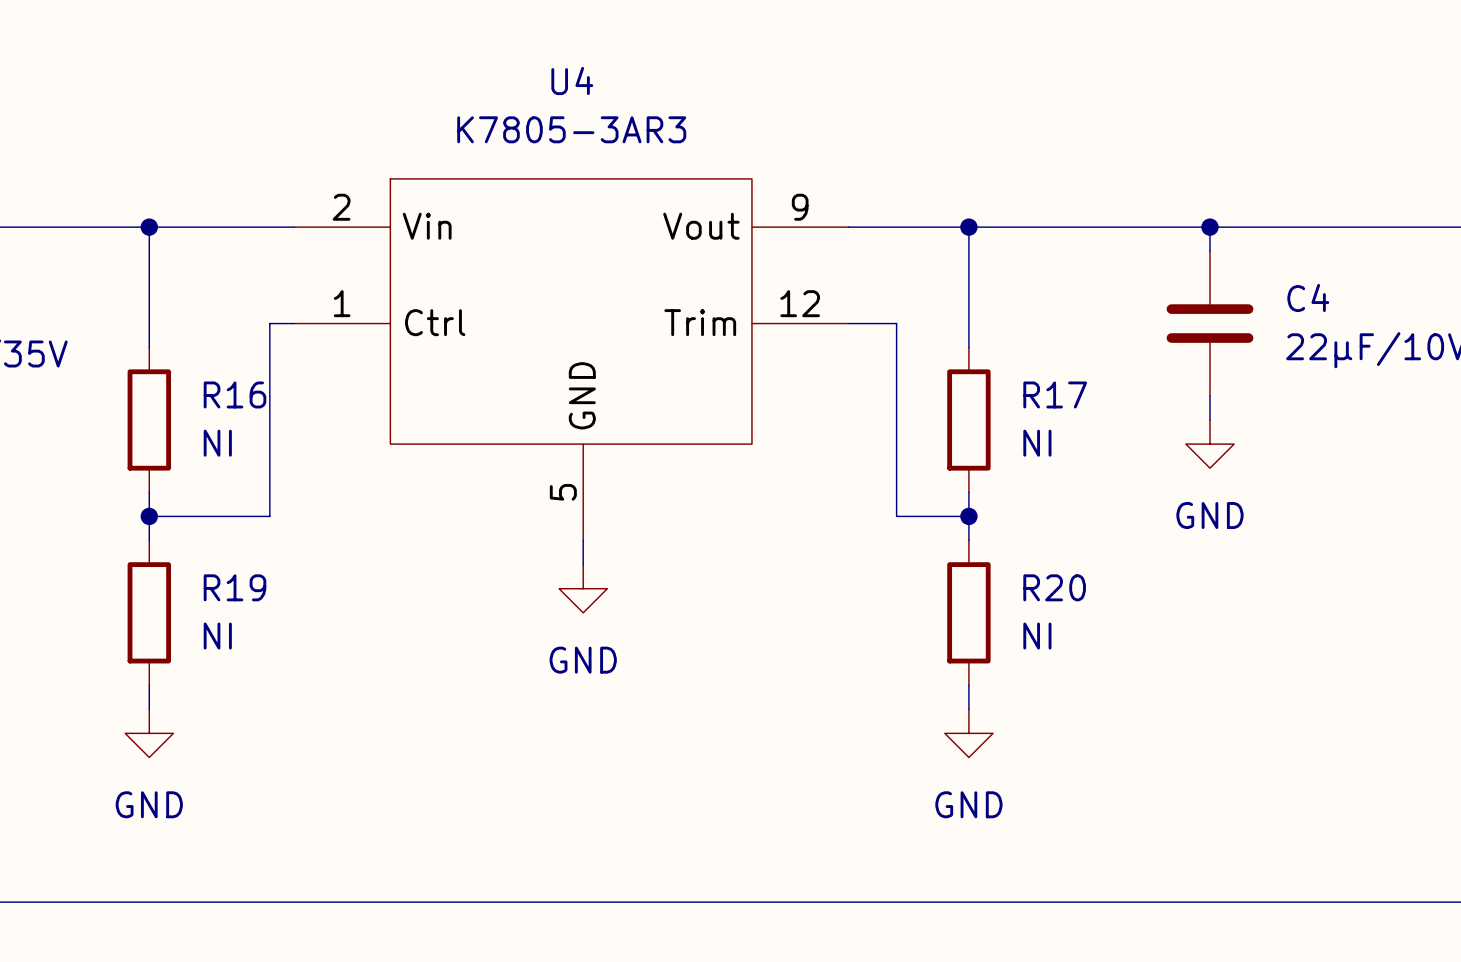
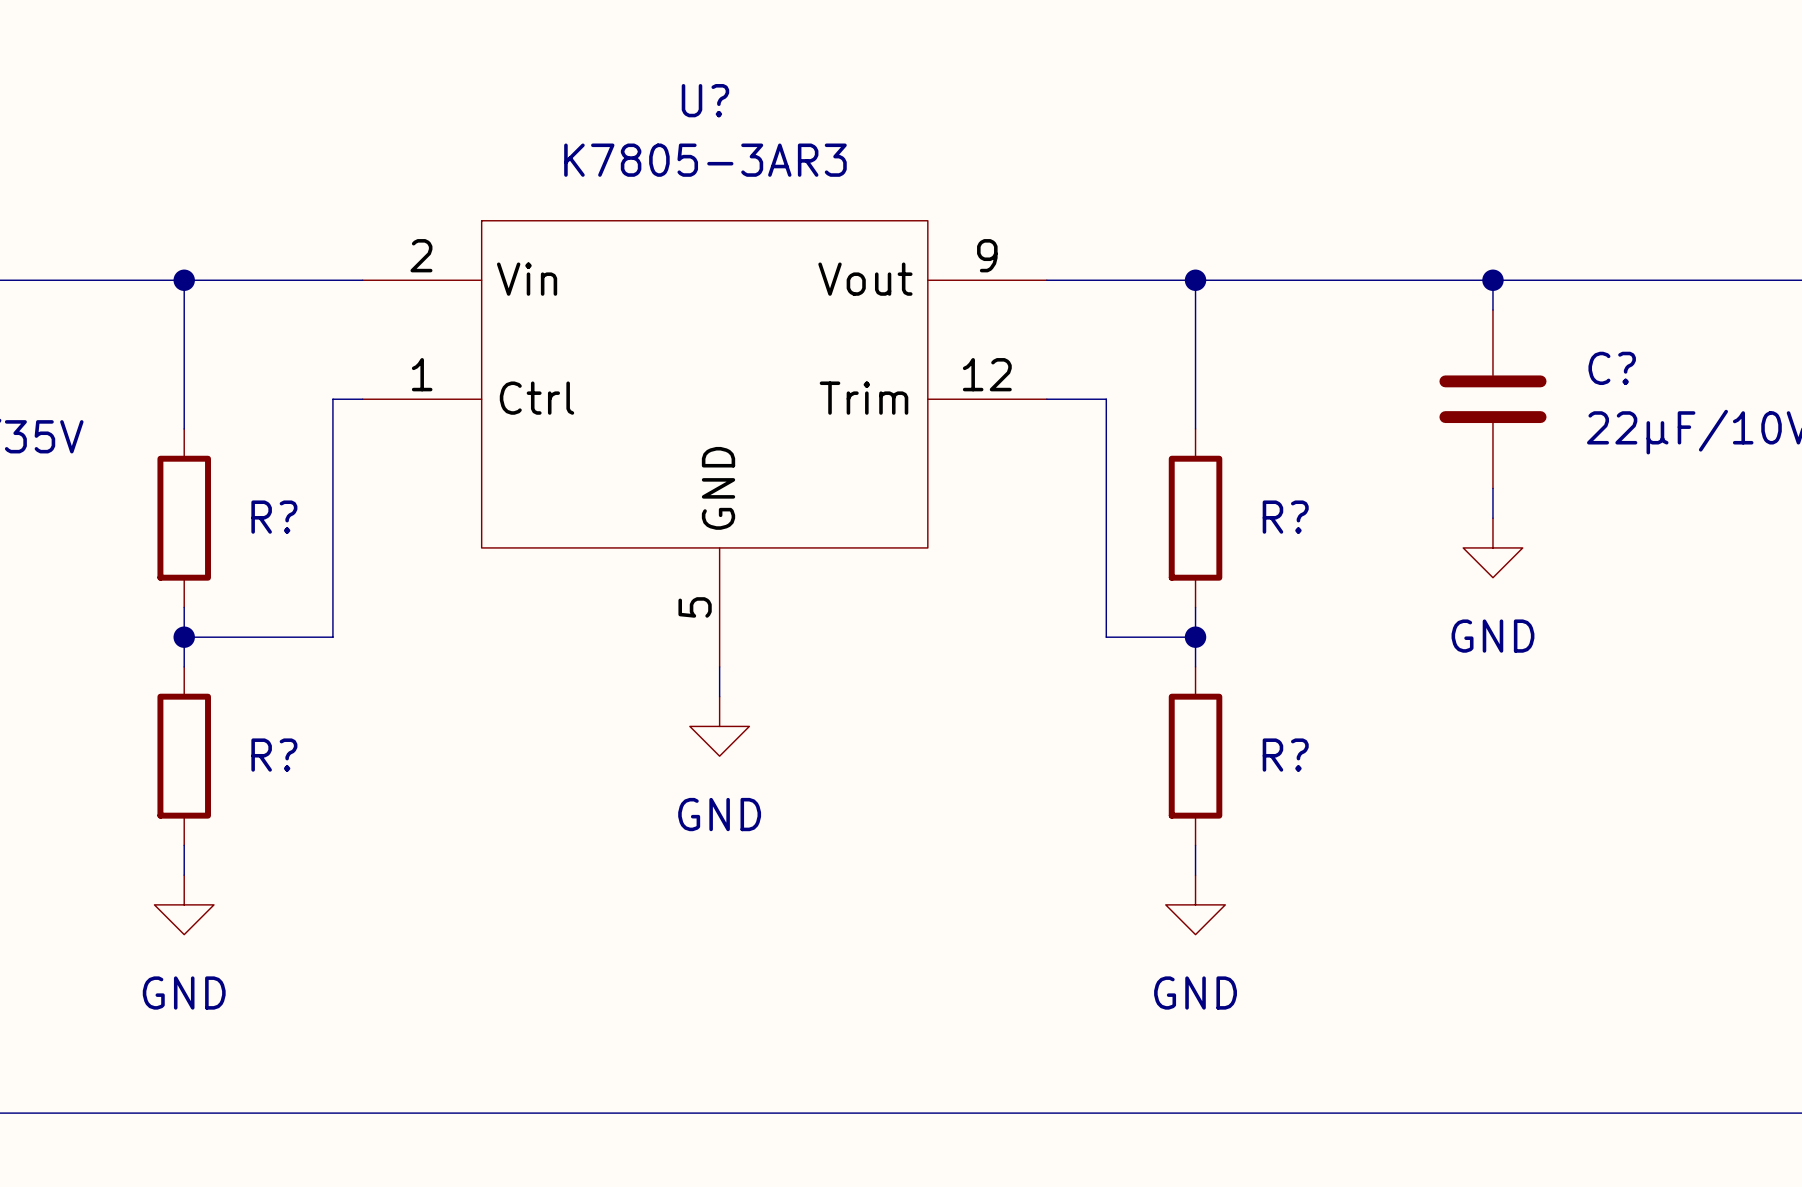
U4 name: U4 (572, 81) -> U? (705, 100)
C4 name: C4 (1308, 297) -> C? (1612, 368)
R16 name: R16 (235, 394) -> R? (274, 517)
R17 name: R17 (1055, 394) -> R? (1285, 517)
R16 value: NI (217, 443) -> none
R17 value: NI (1037, 443) -> none
R19 name: R19 (235, 587) -> R? (274, 755)
R20 name: R20 (1054, 587) -> R? (1285, 755)
R19 value: NI (217, 636) -> none
R20 value: NI (1037, 636) -> none

